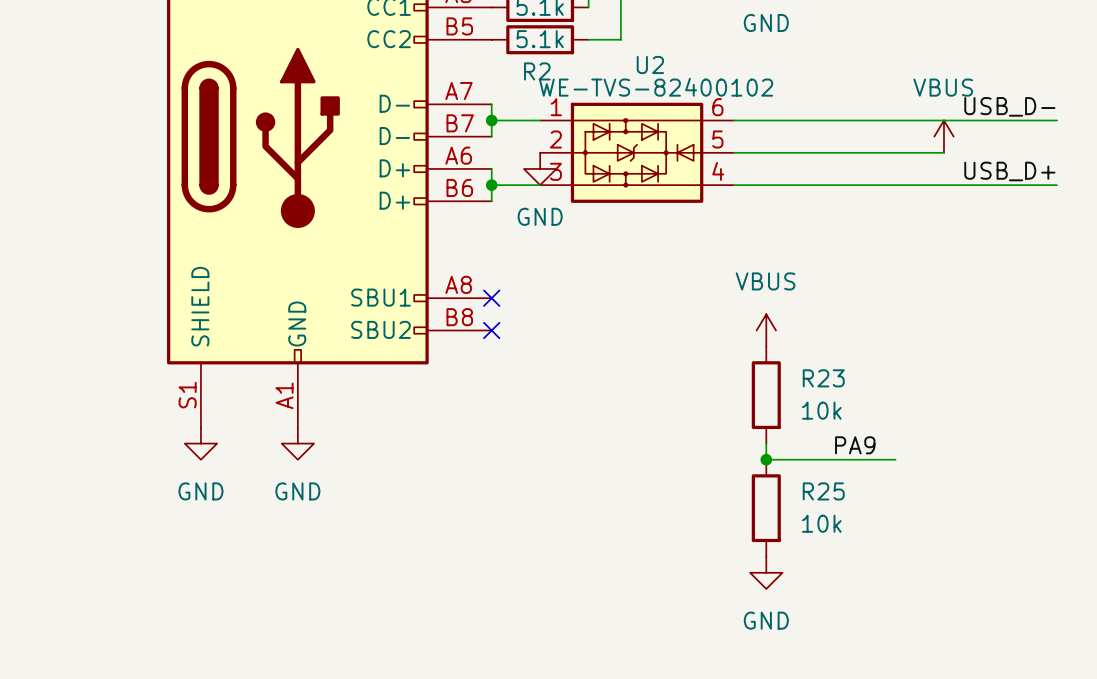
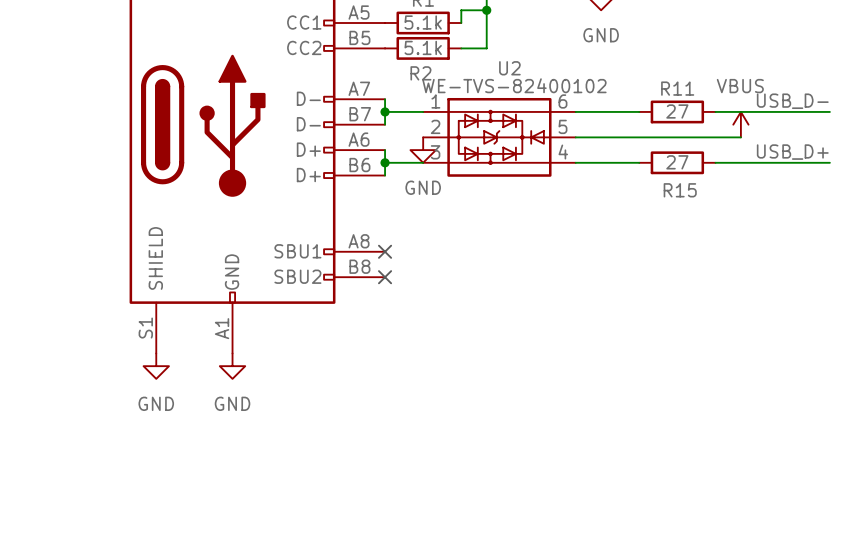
wire: (814, 120) (911, 120) -> none
R11: none -> 27 (677, 111)
wire: (814, 185) (911, 185) -> none
R15: none -> 27 (677, 162)
power symbol: VBUS (766, 330) -> none
R23: 10k (766, 395) -> none
wire: (766, 443) (766, 459) (895, 459) -> none
label: PA9 (855, 445) -> none
junction: (766, 459) -> none
R25: 10k (766, 508) -> none
power symbol: GND (766, 572) -> none

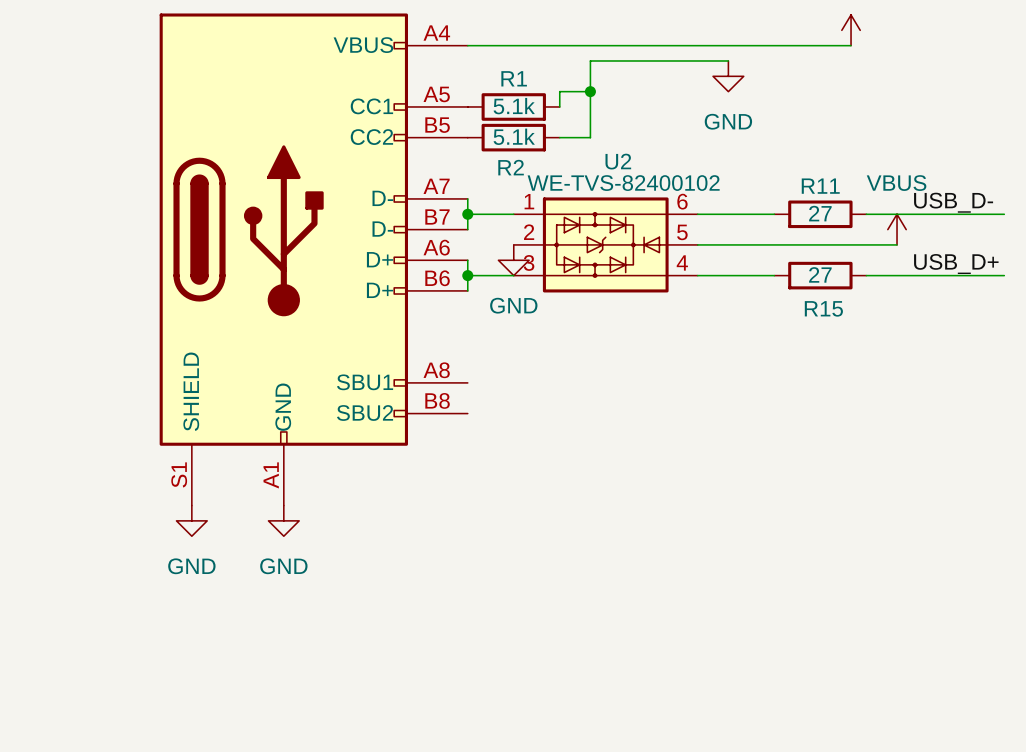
no-connect mark: (385, 251) -> none
no-connect mark: (385, 277) -> none

